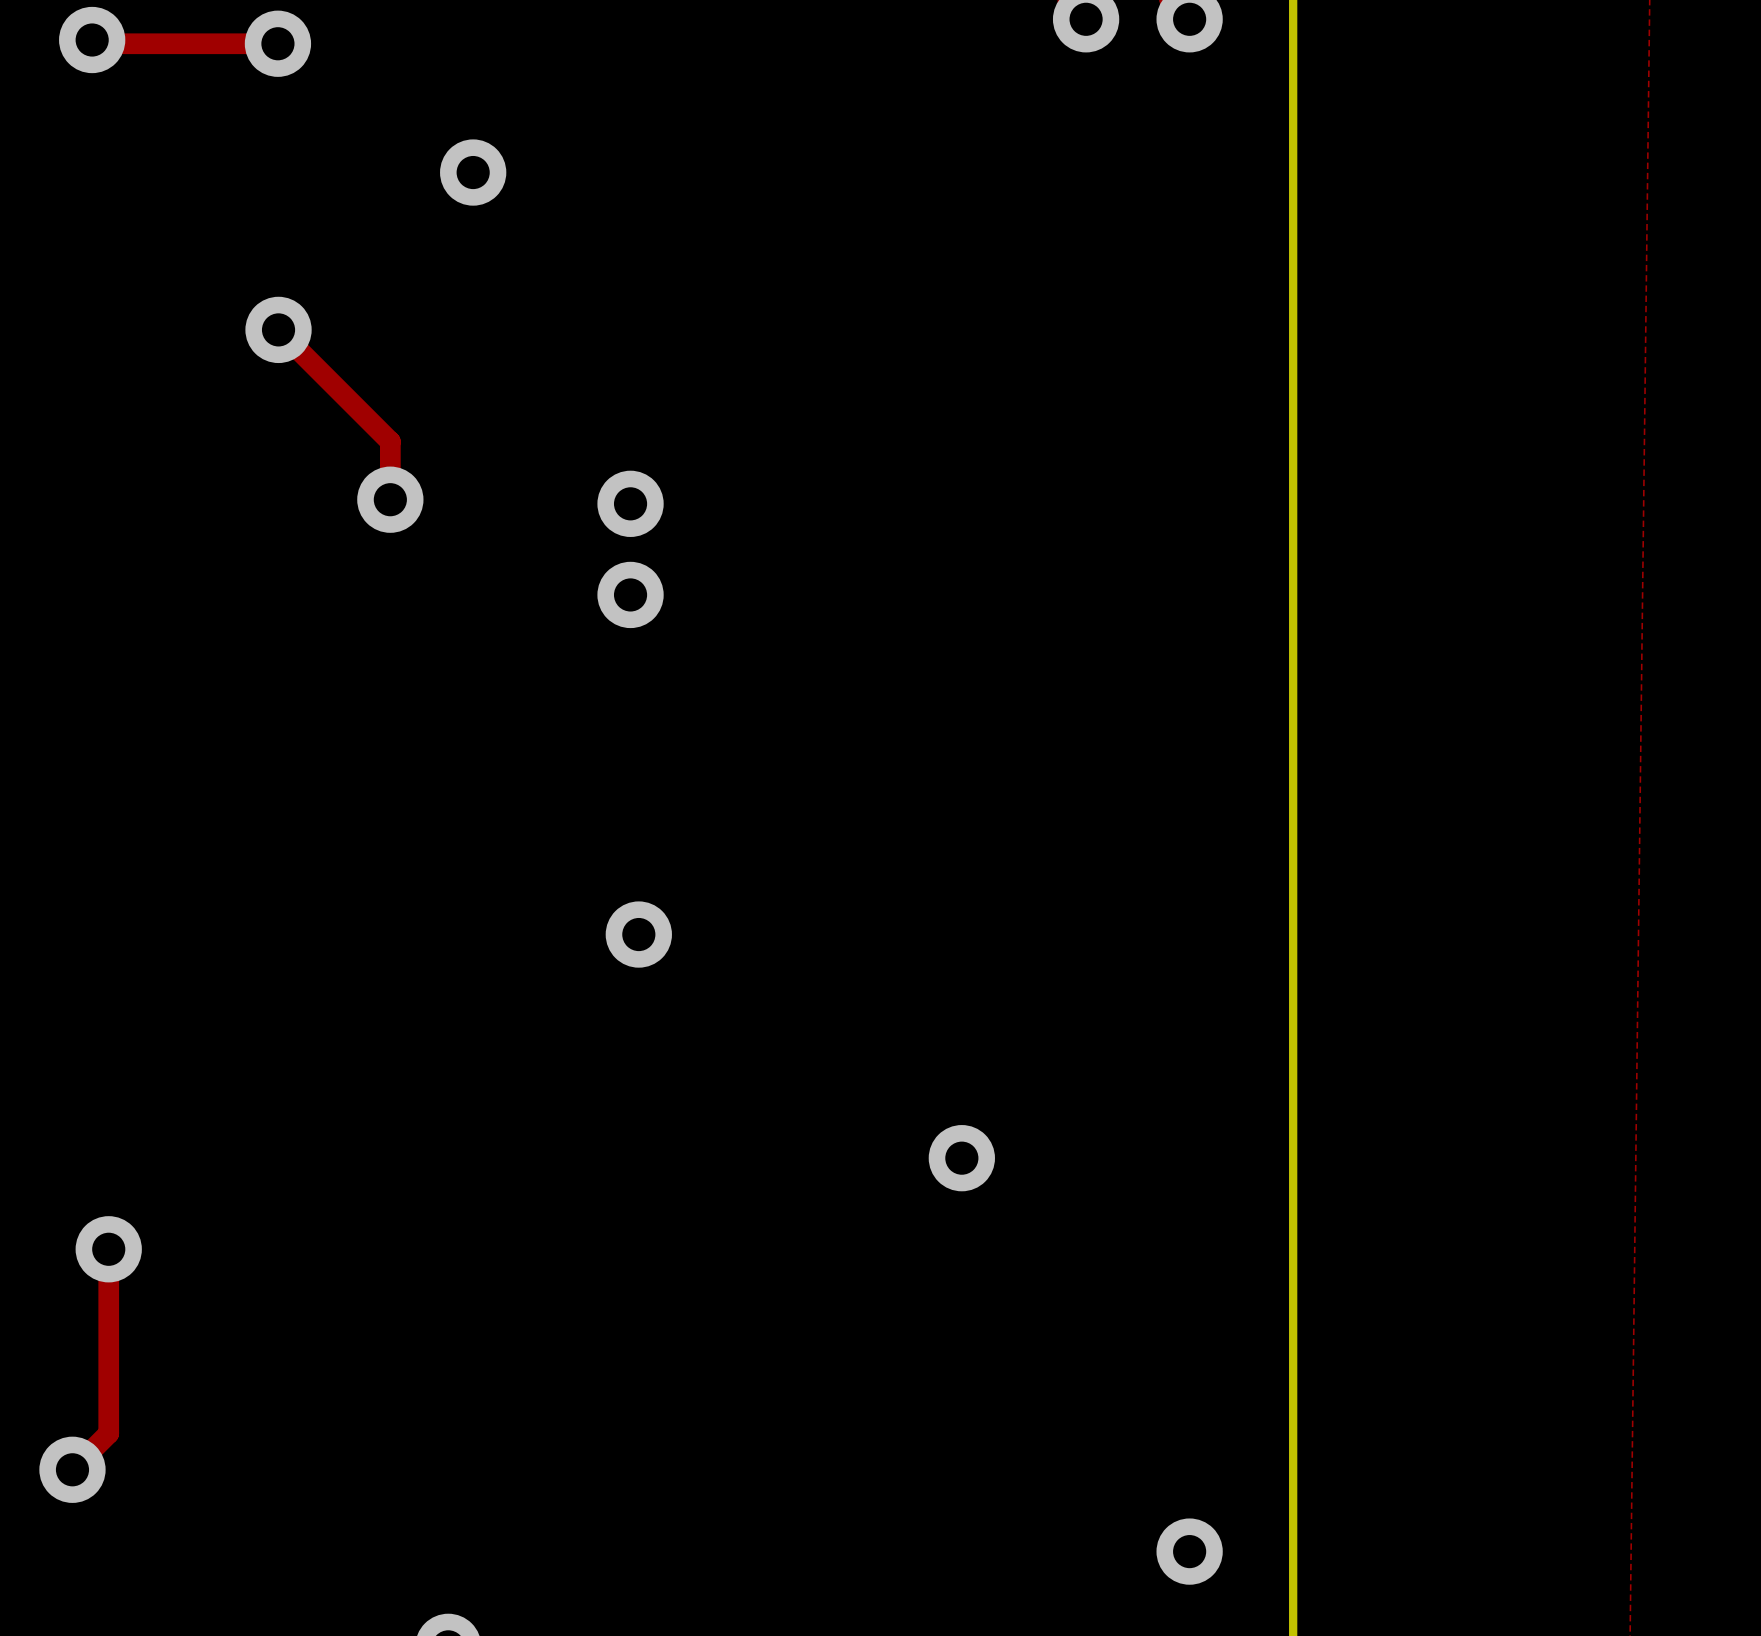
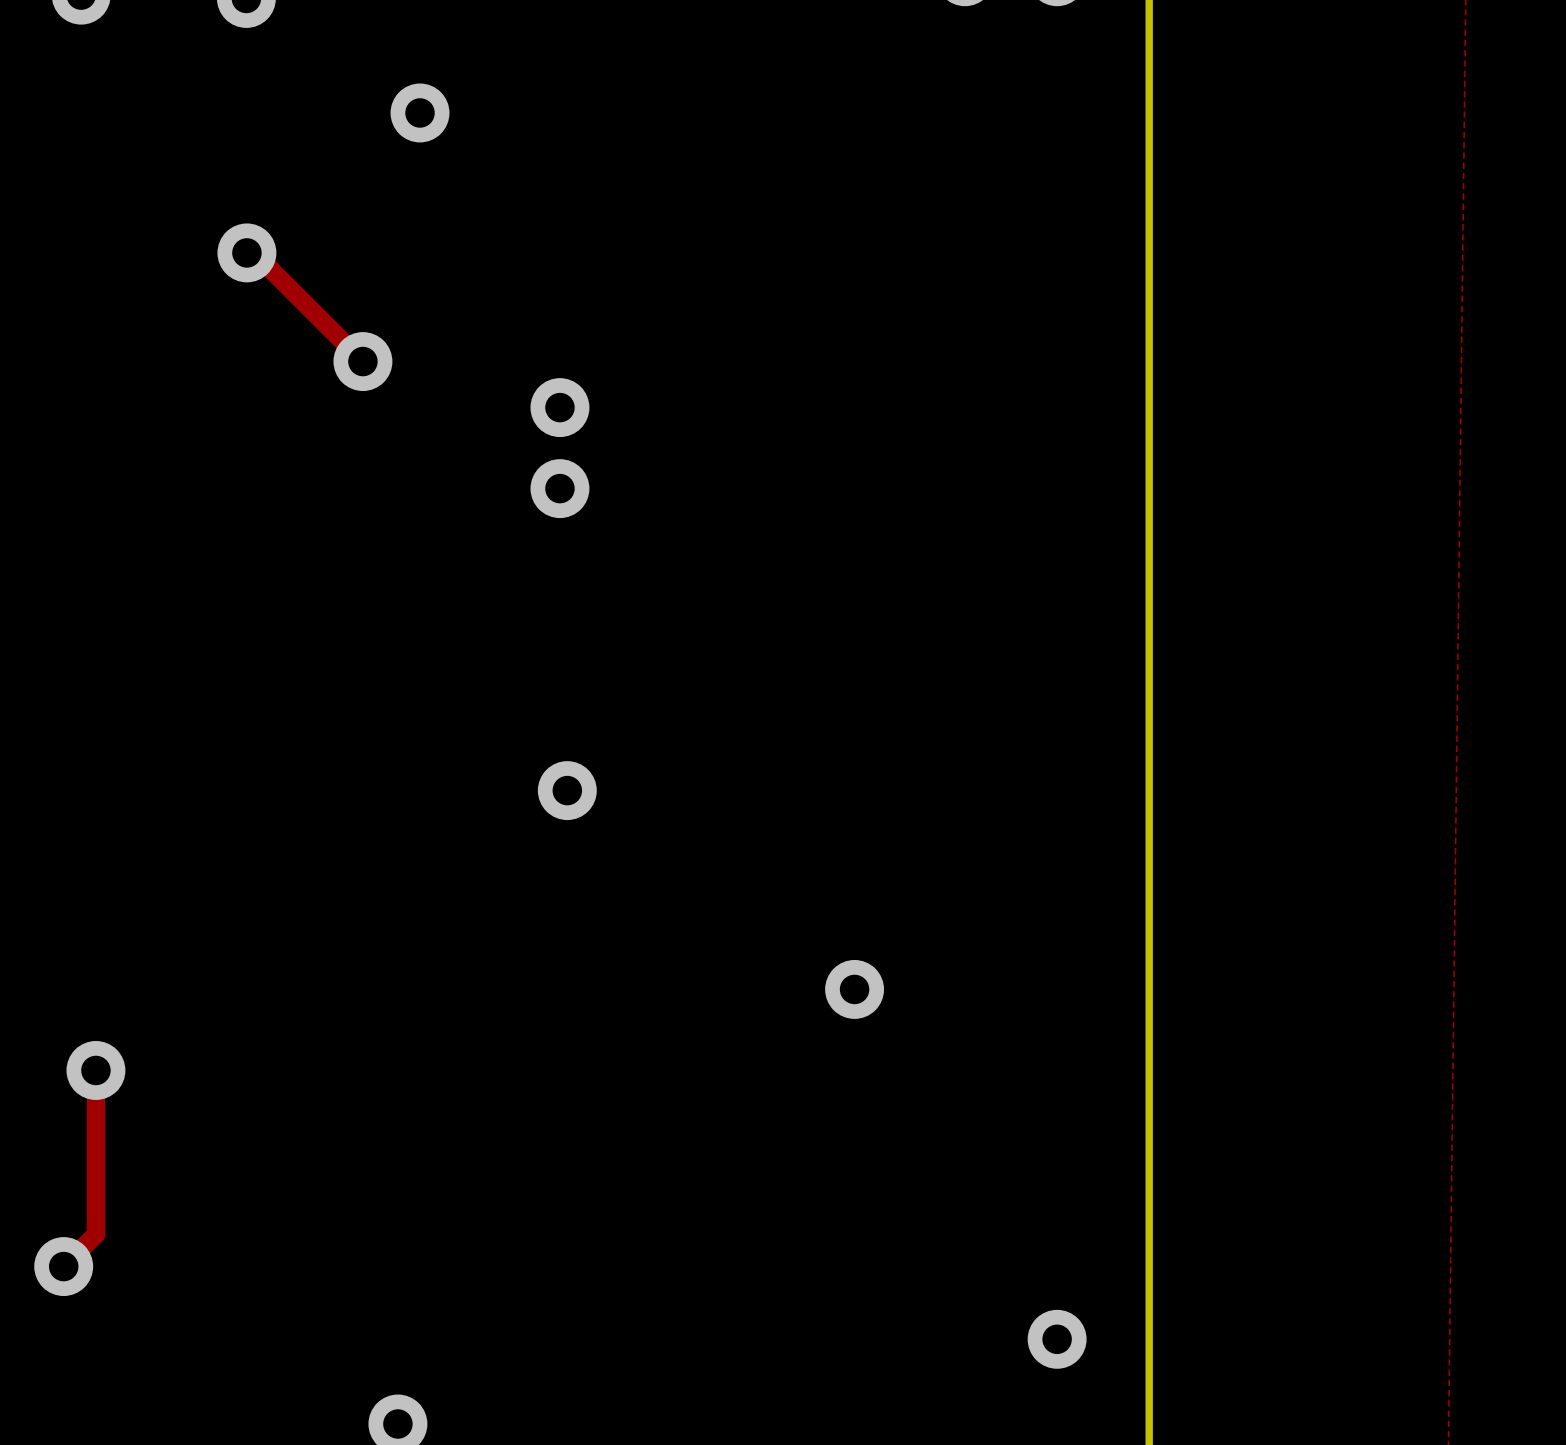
track: (278, 329) (390, 441) (390, 499) -> (246, 252) (254, 252) (362, 361)
via position: (390, 499) -> (362, 361)

